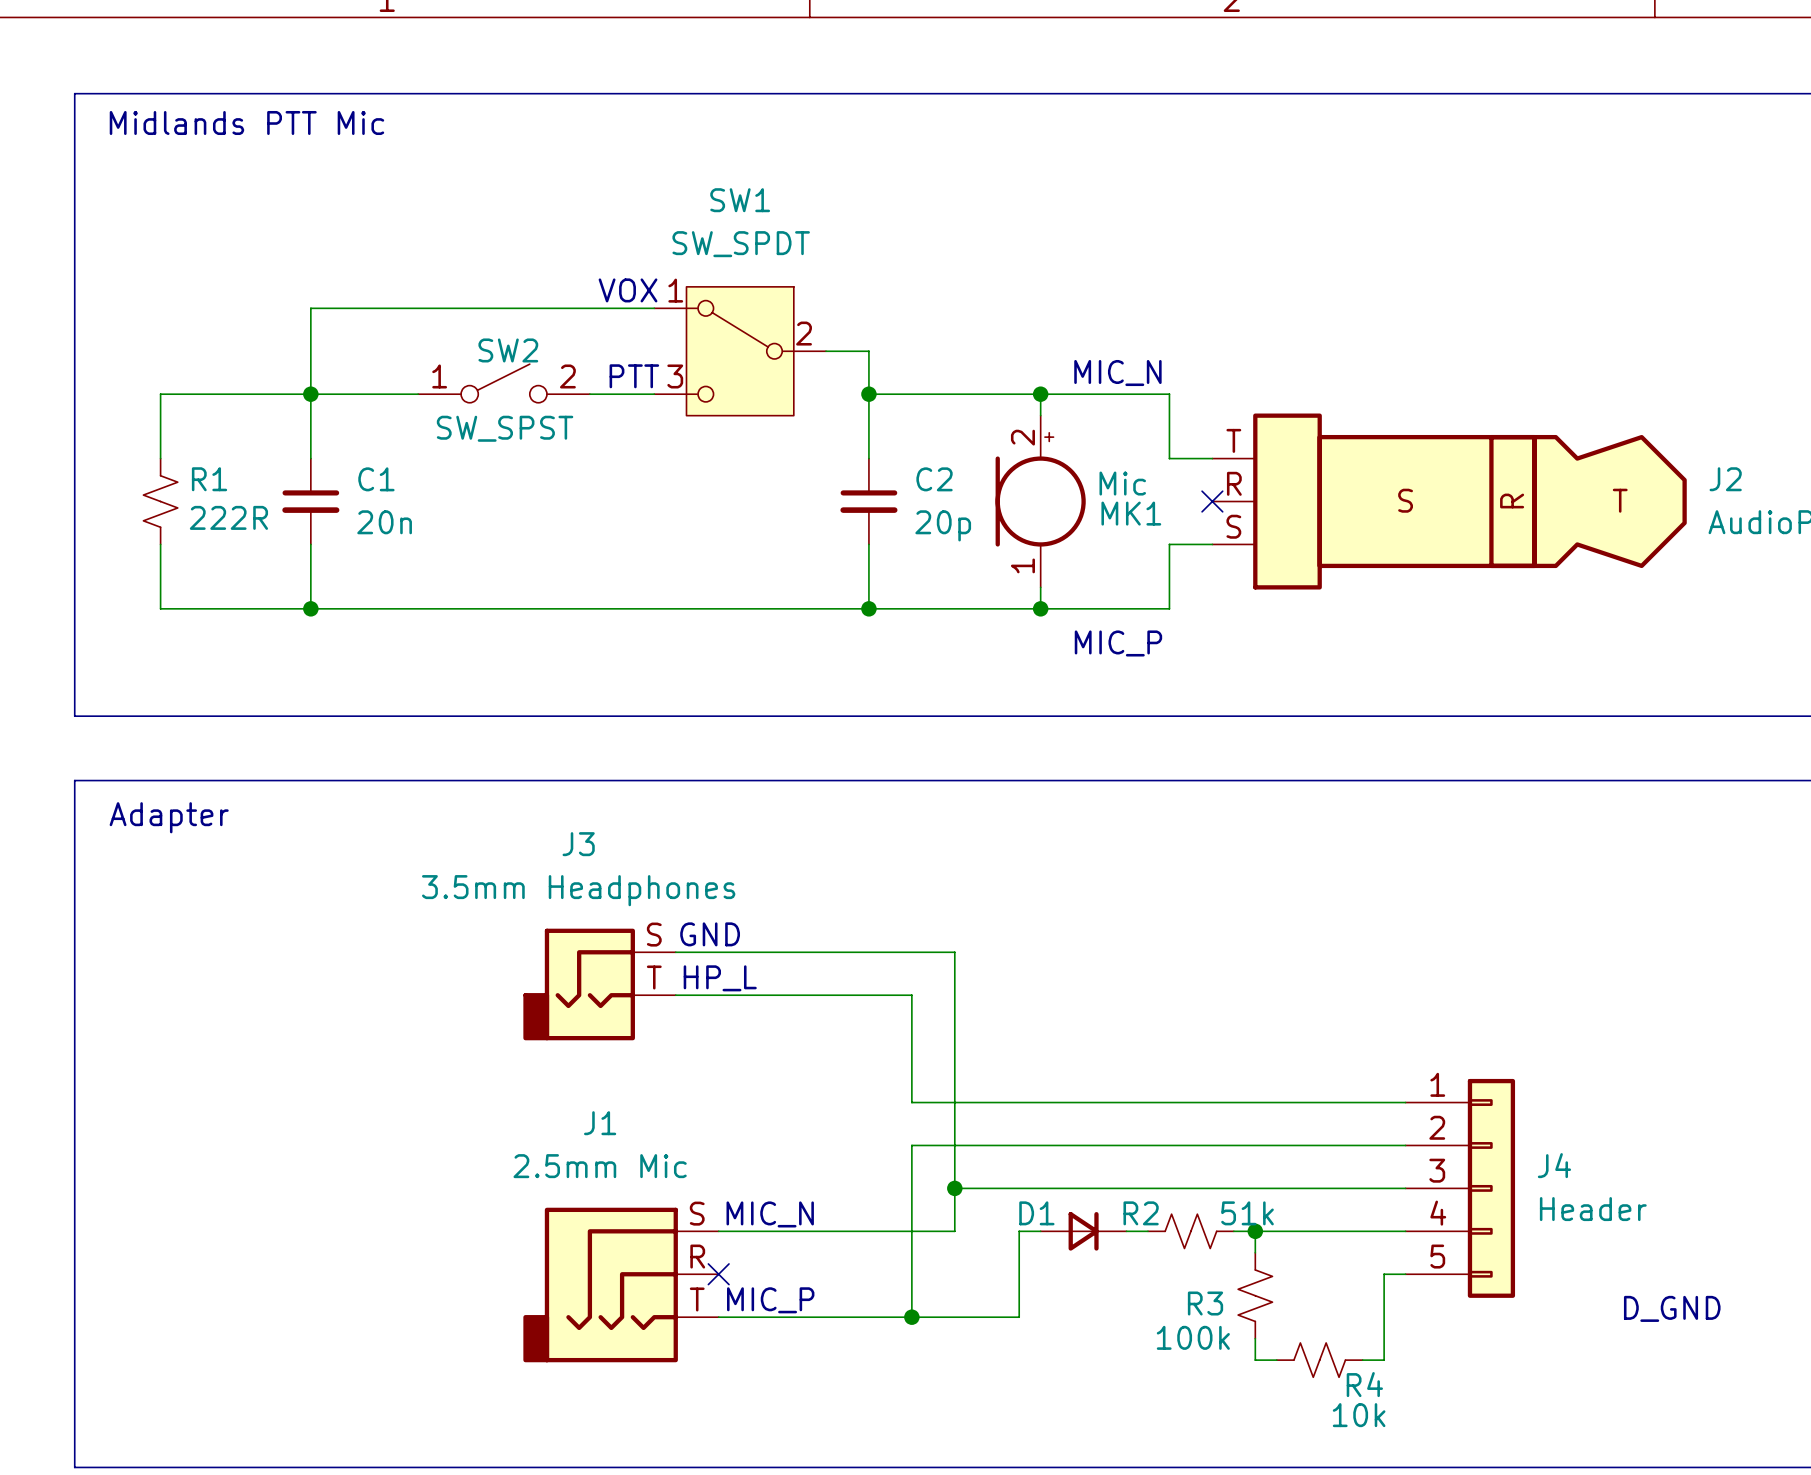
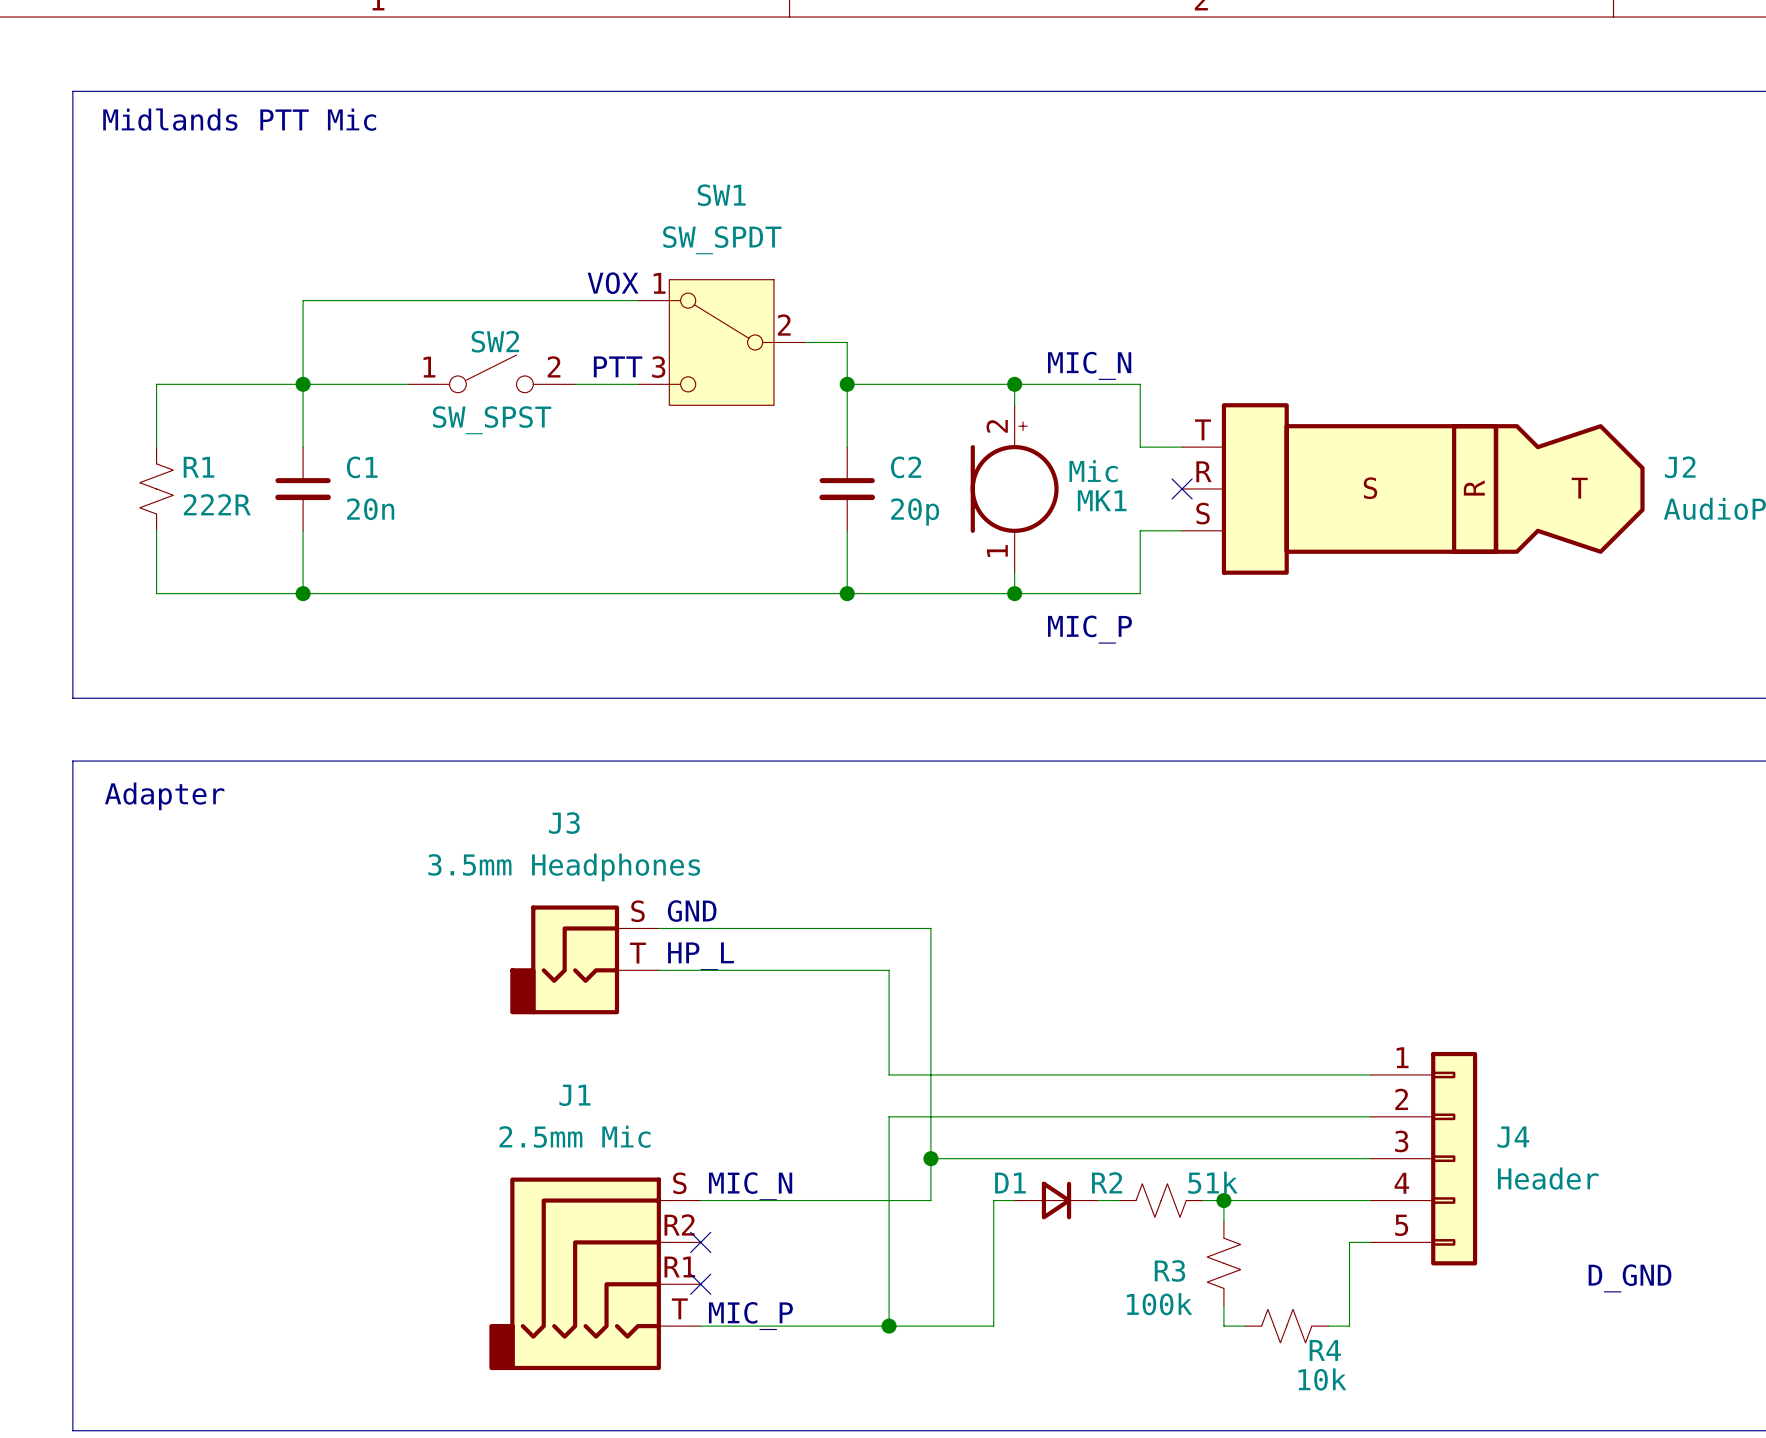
J1 symbol: [523, 1207, 719, 1363] -> [489, 1177, 701, 1371]
text position: MIC_P (770, 1300) -> MIC_P (750, 1316)
wire: (718, 1317) (1019, 1317) -> (700, 1326) (993, 1326) (993, 1284)
no-connect mark: none -> (700, 1284)
wire: none -> (889, 1284) (889, 1326)
junction position: (911, 1317) -> (889, 1326)

